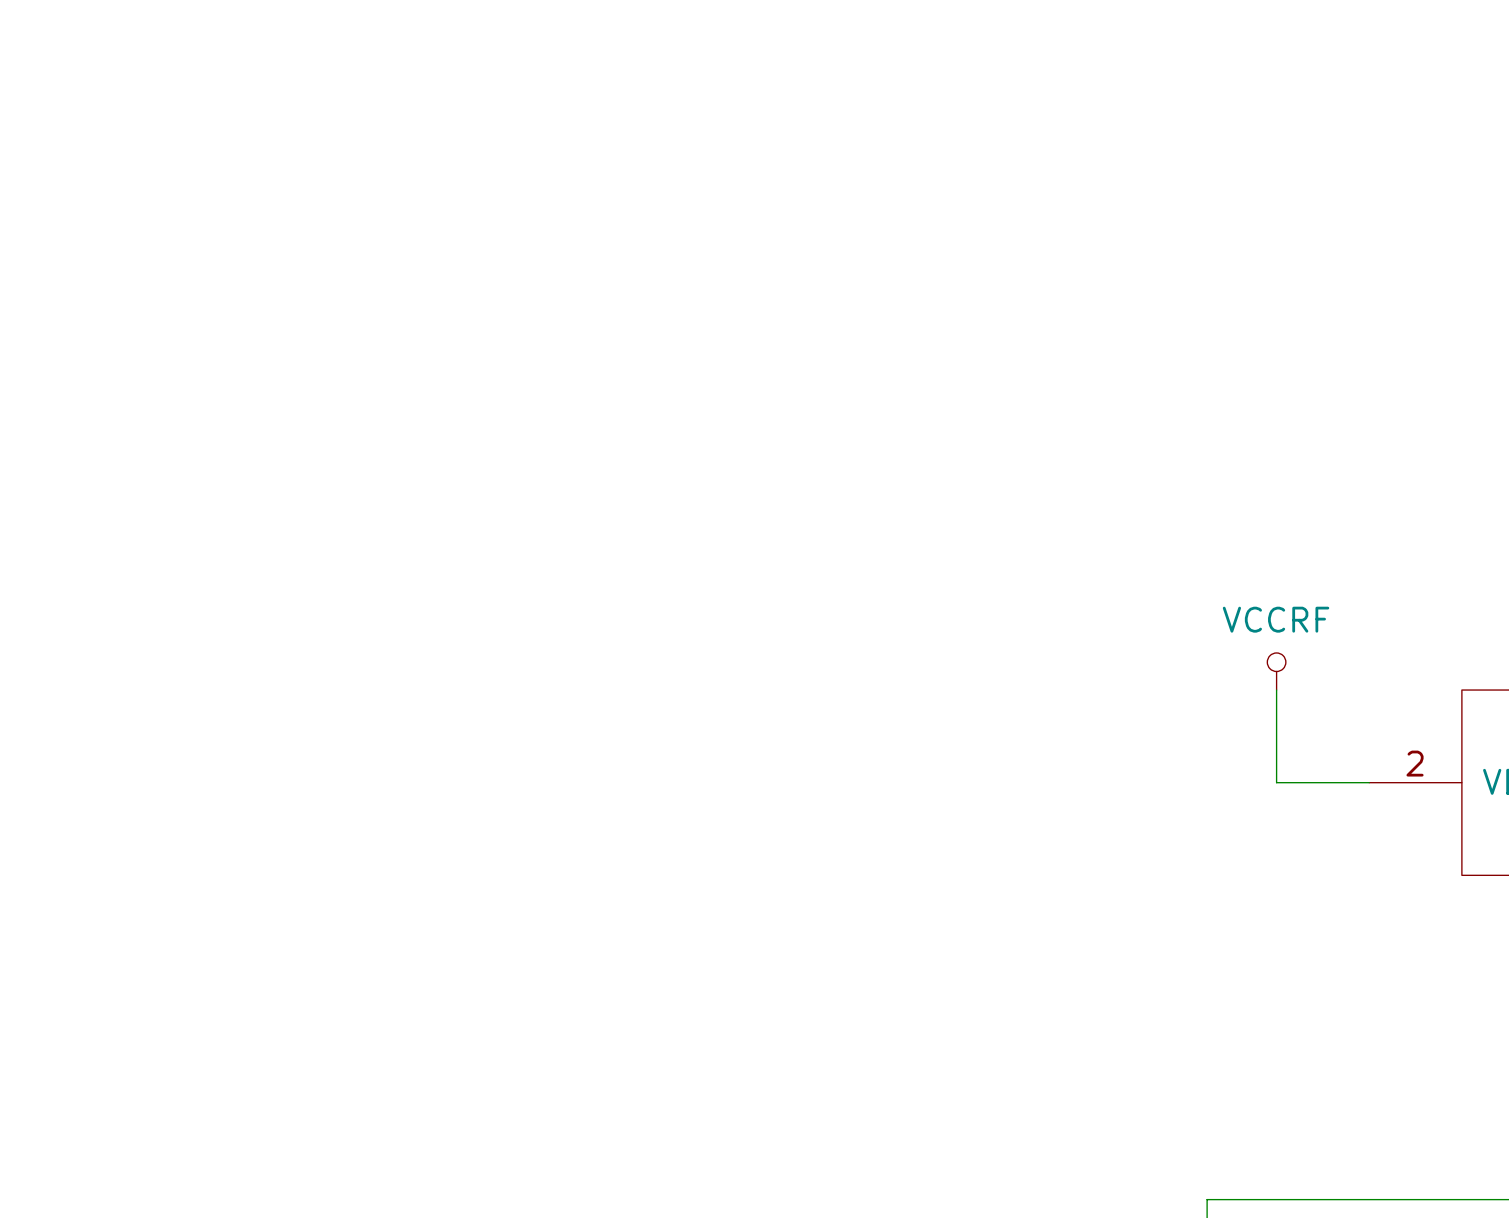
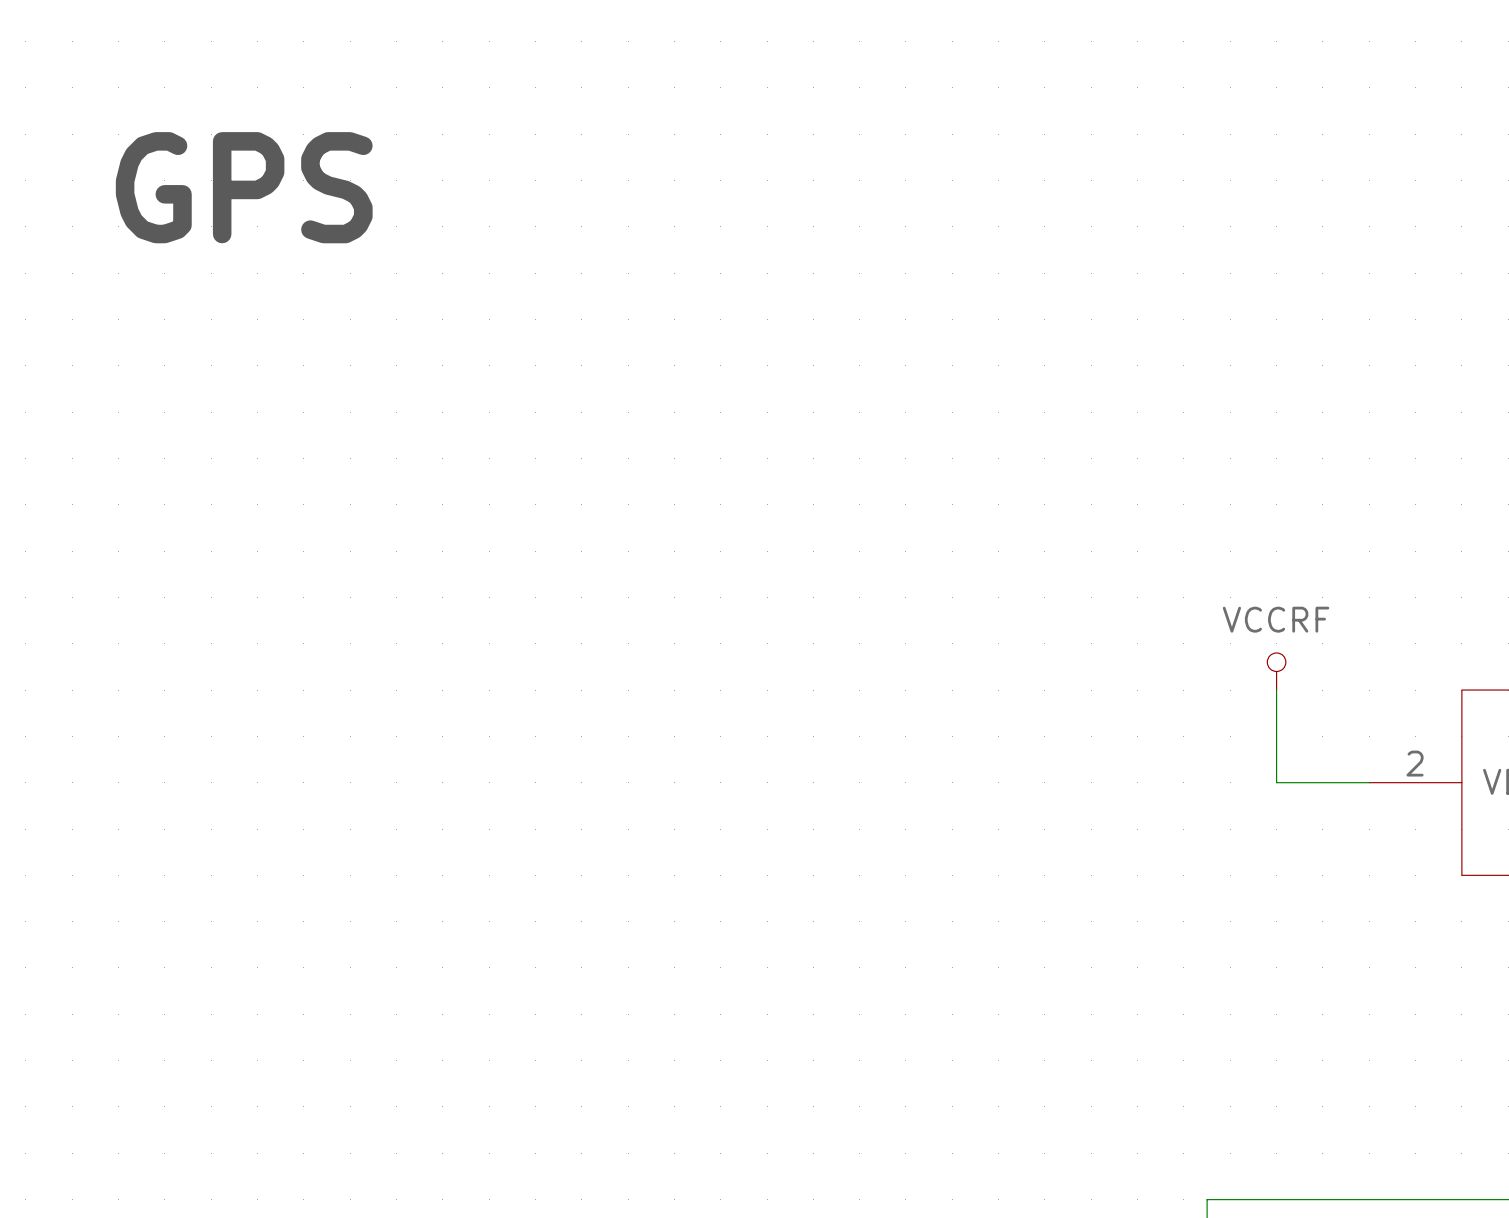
text: none -> GPS (244, 187)

